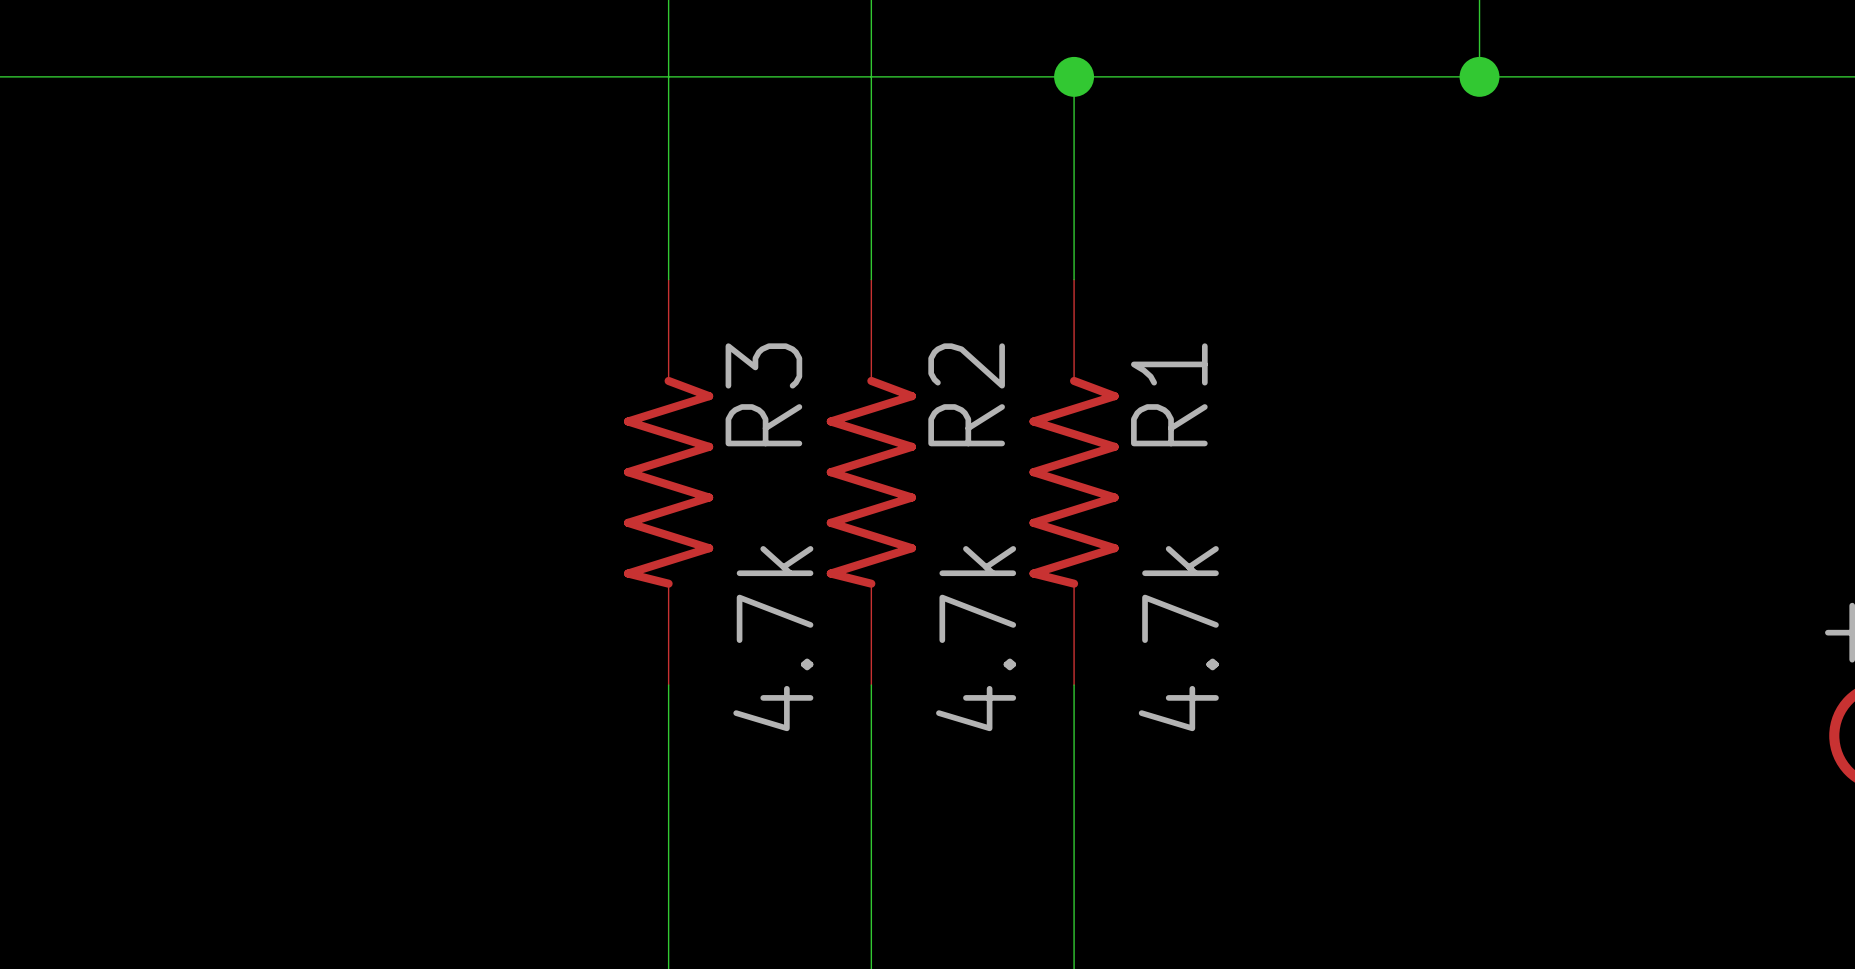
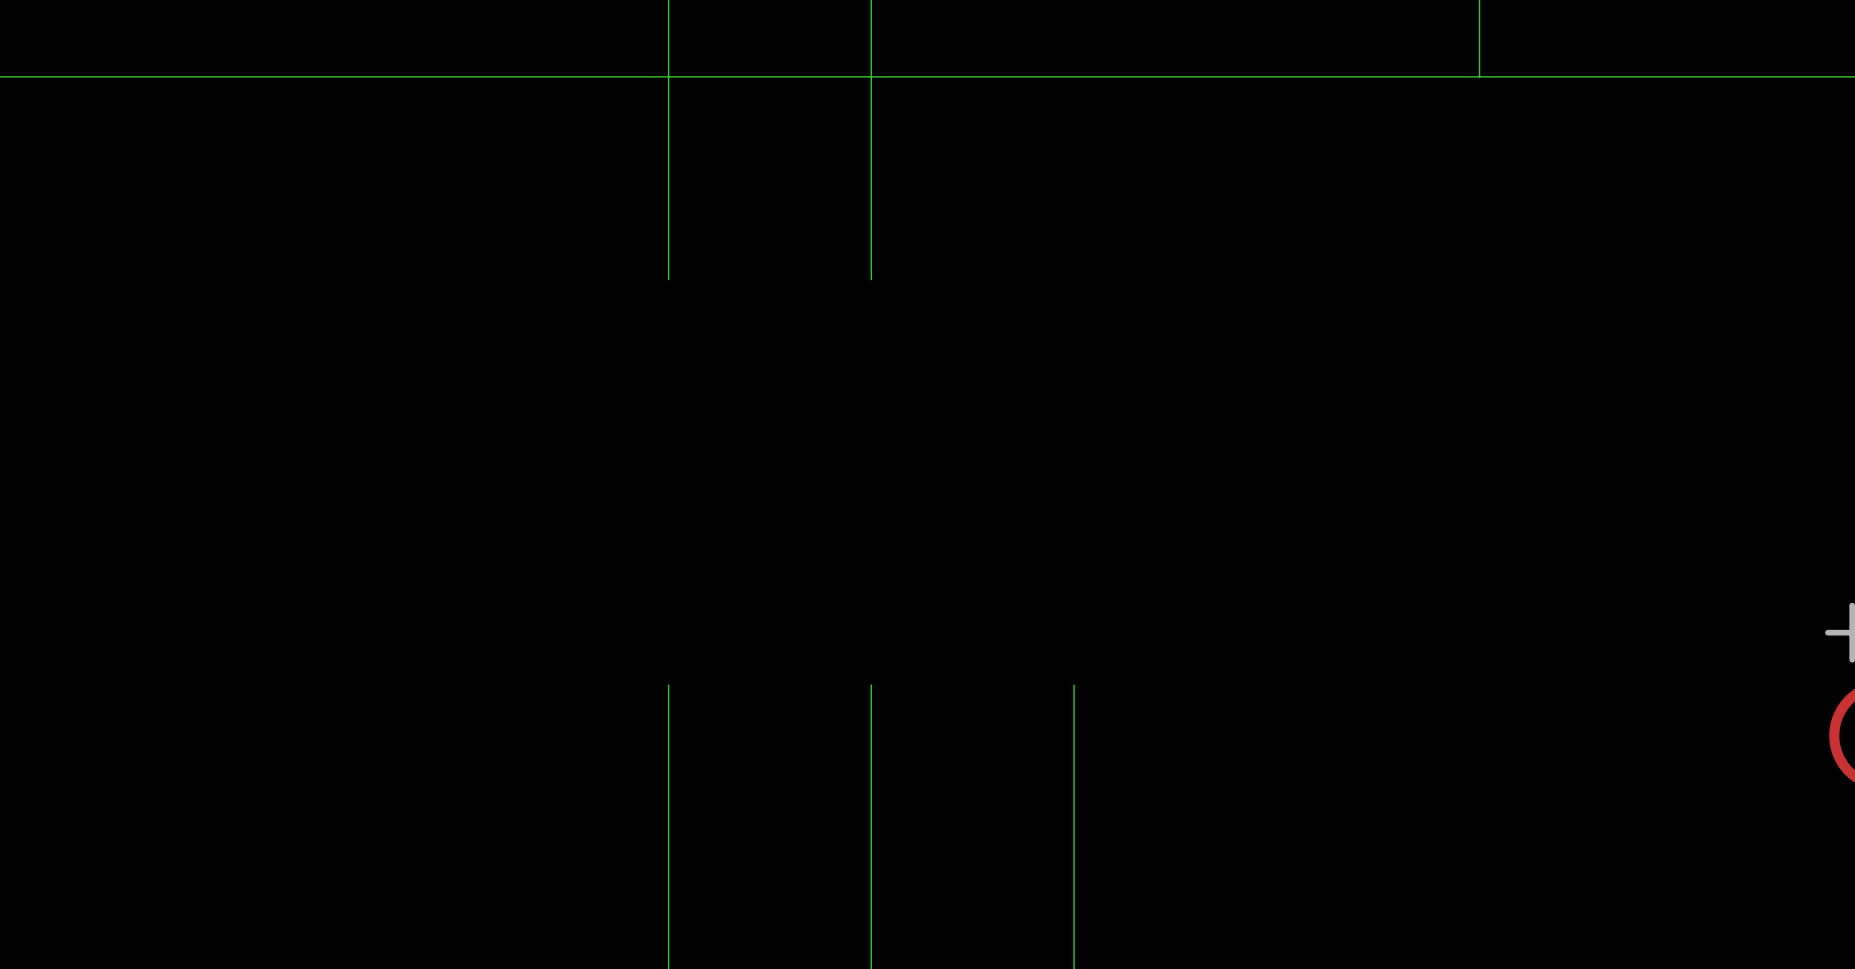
wire: (1074, 76) (1074, 279) -> none
junction: (1074, 76) -> none
junction: (1479, 76) -> none
R3: 4.7k (668, 482) -> none
R2: 4.7k (871, 482) -> none
R1: 4.7k (1074, 482) -> none

